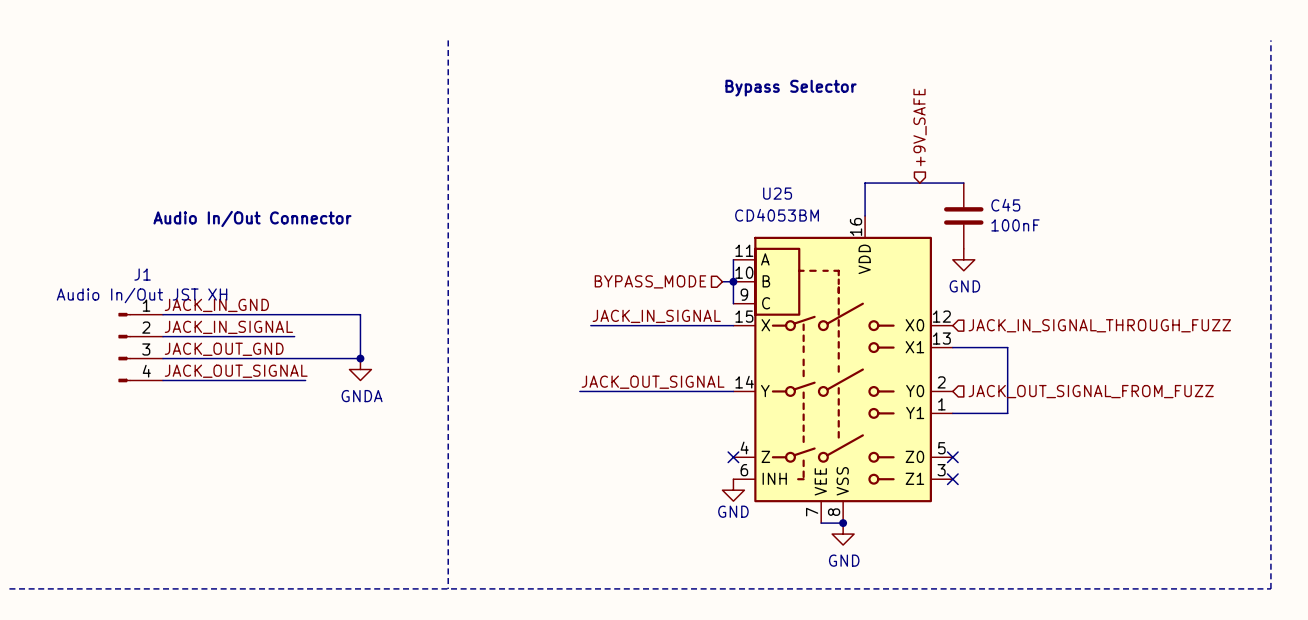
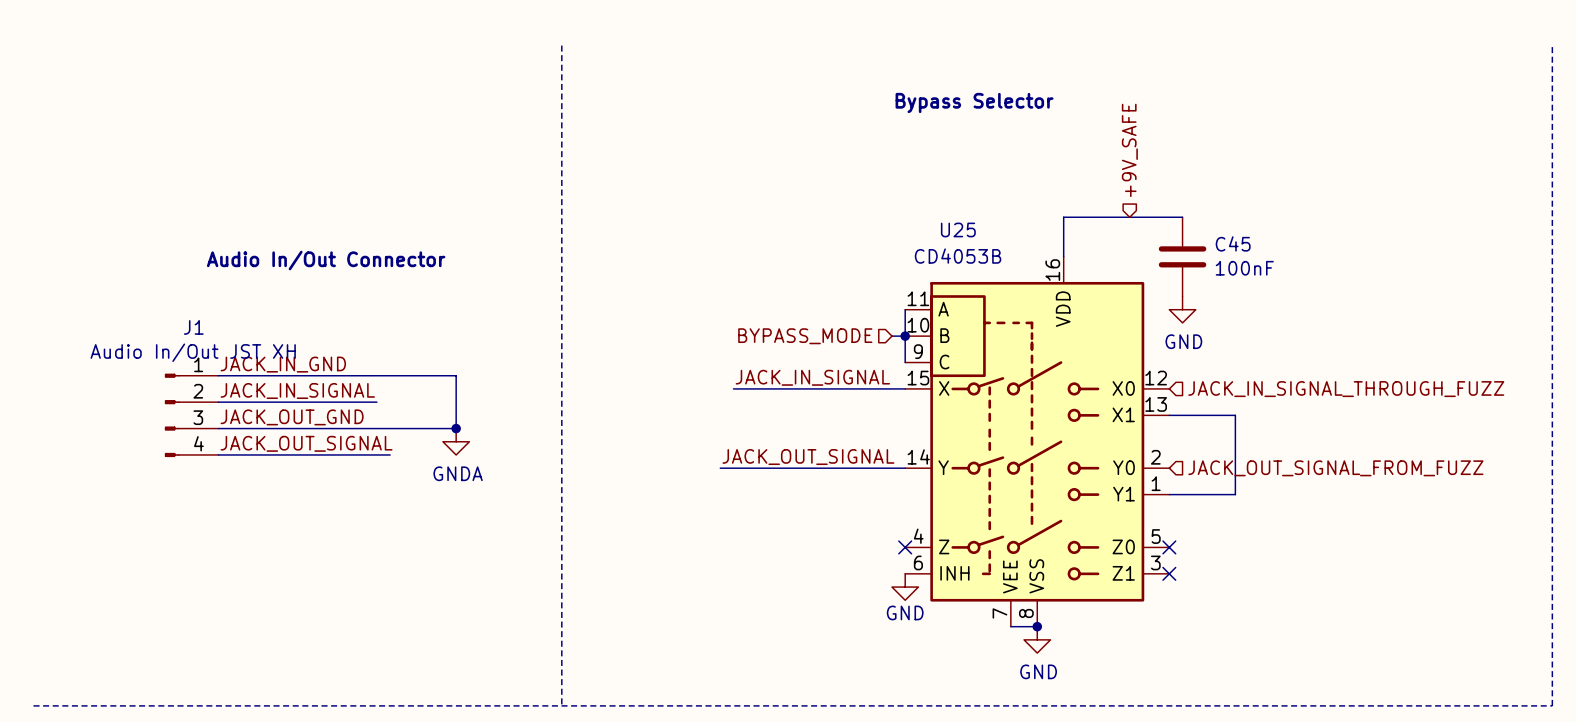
U25 value: CD4053BM (777, 215) -> CD4053B (958, 256)

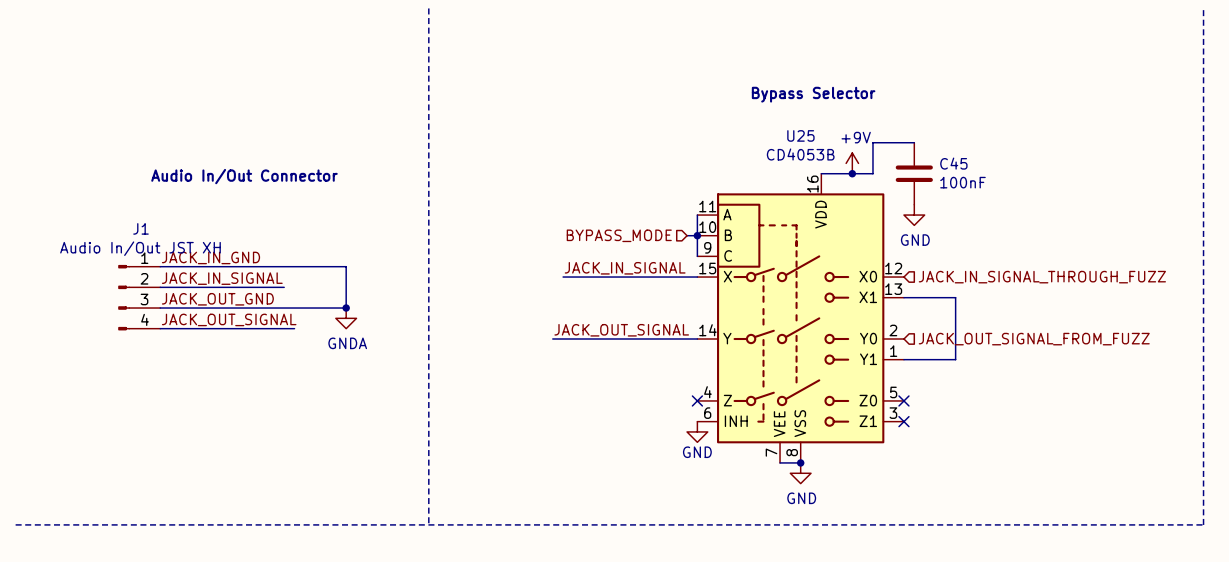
text position: Bypass Selector (974, 102) -> Bypass Selector (813, 94)
hierarchical label: +9V_SAFE (1129, 150) -> none
wire: (1129, 217) (1063, 217) (1063, 256) -> (872, 142) (872, 173) (821, 173)
U25 name position: U25 (958, 229) -> U25 (800, 135)
power symbol: none -> +9V (852, 163)
U25 value position: CD4053B (958, 256) -> CD4053B (800, 154)
junction: none -> (852, 173)

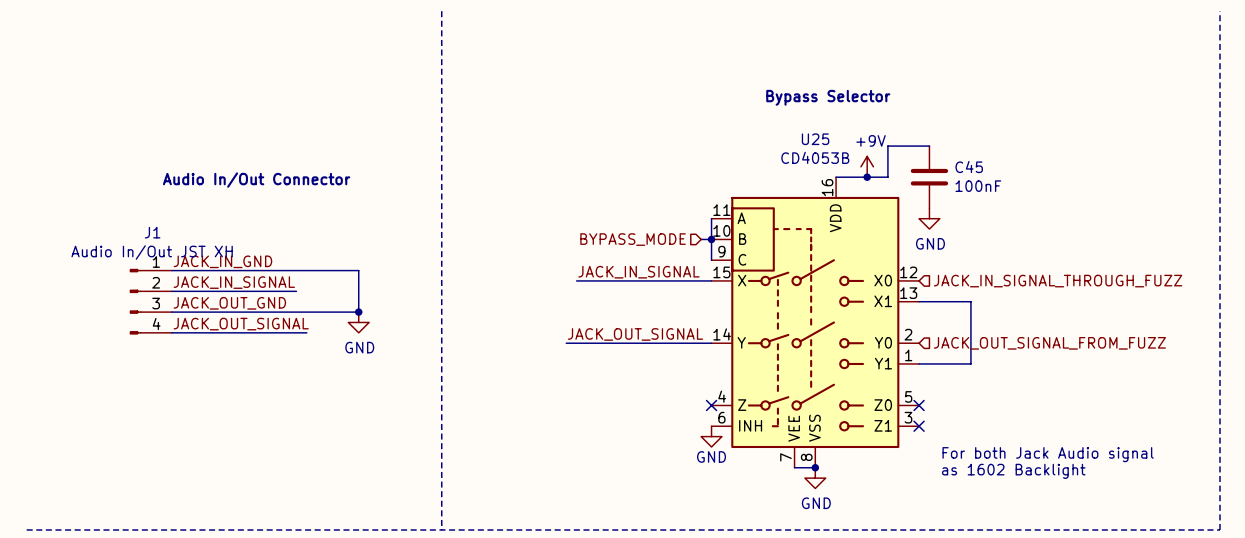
power symbol: GNDA (346, 318) -> GND (358, 322)
text: none -> For both Jack Audio signal (1048, 454)
text: none -> as 1602 Backlight (1013, 471)

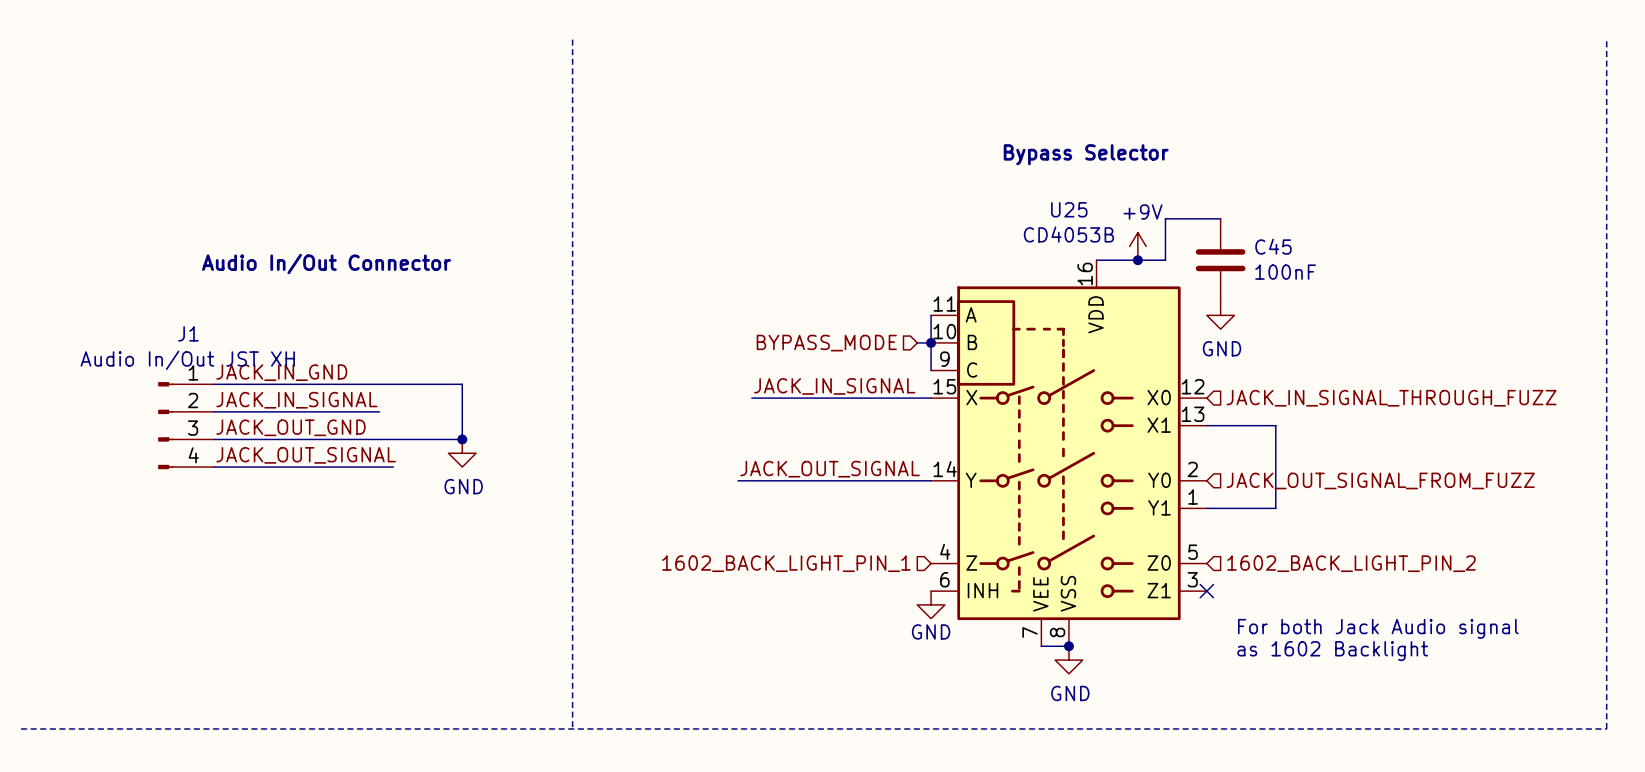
hierarchical label: none -> 1602_BACK_LIGHT_PIN_1 (786, 563)
no-connect mark: (711, 405) -> none
no-connect mark: (919, 405) -> none
hierarchical label: none -> 1602_BACK_LIGHT_PIN_2 (1351, 563)

